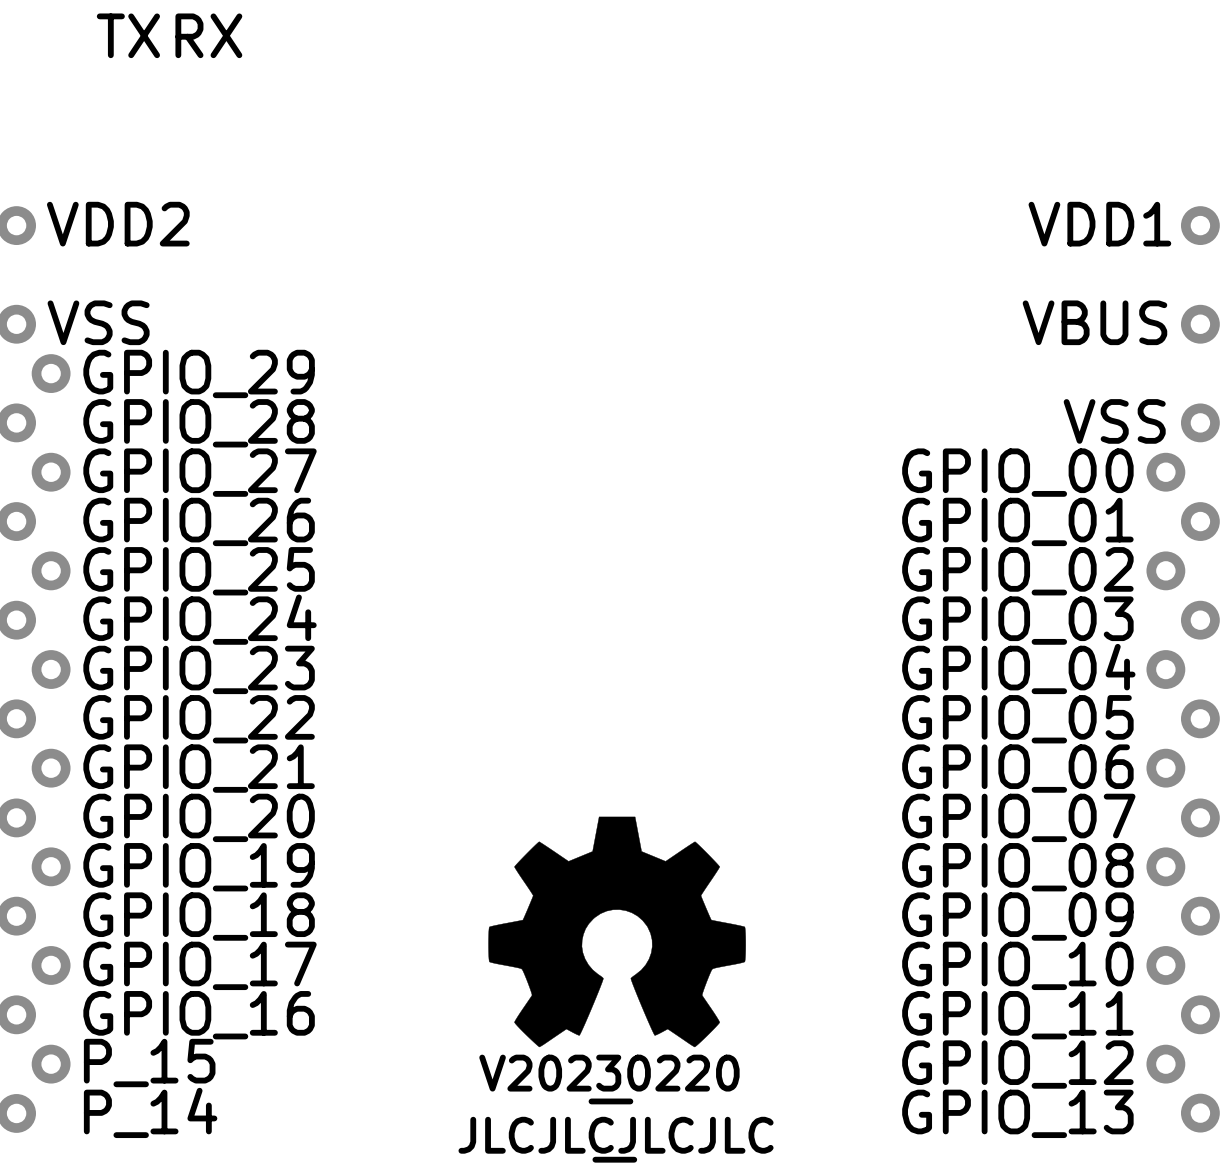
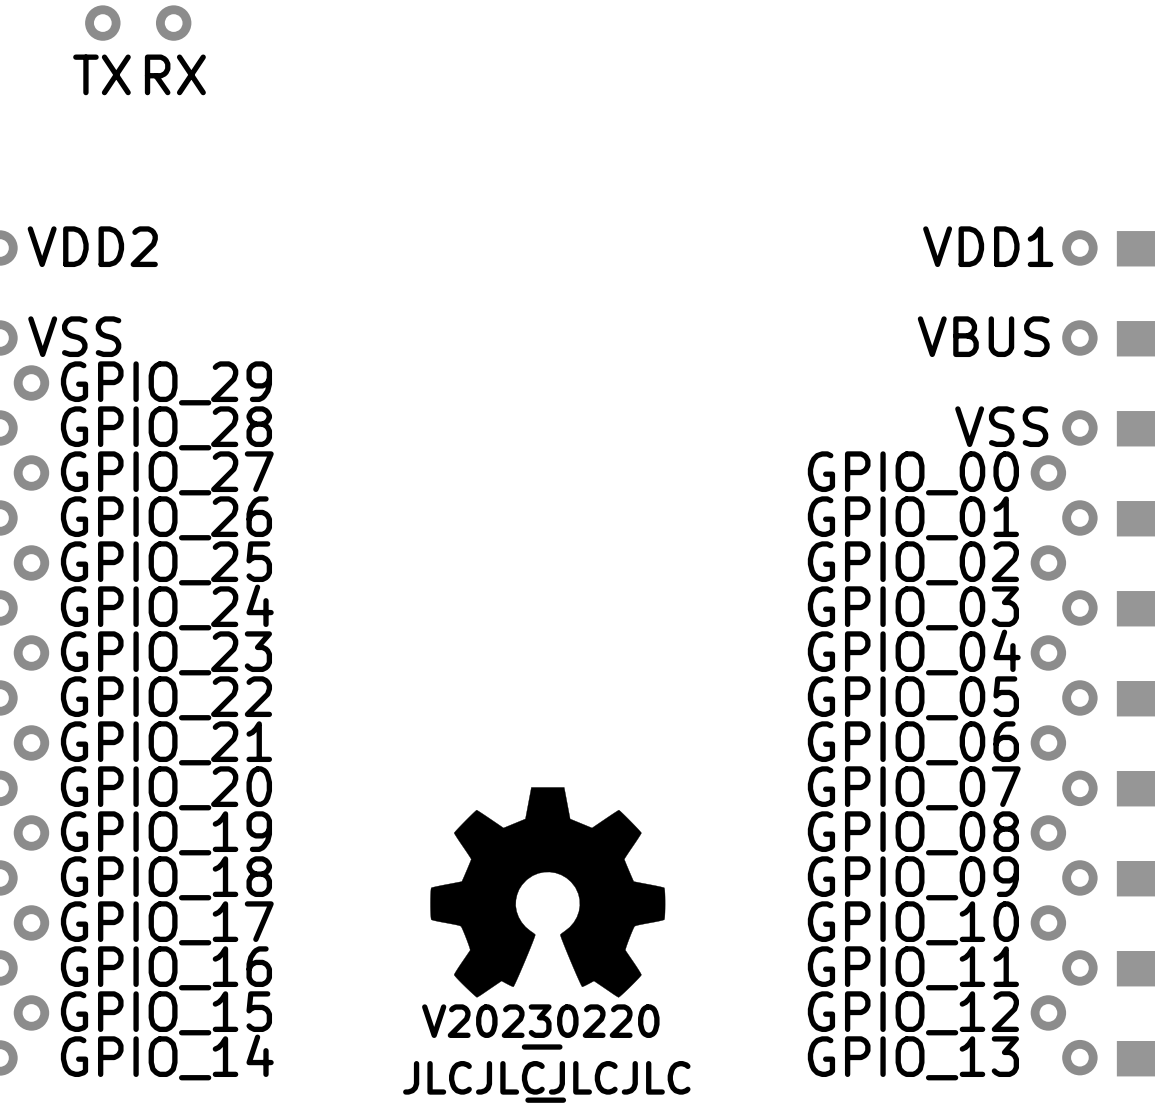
part value: P_15 (149, 1063) -> GPIO_15 (166, 1013)
part value: P_14 (150, 1112) -> GPIO_14 (167, 1057)

